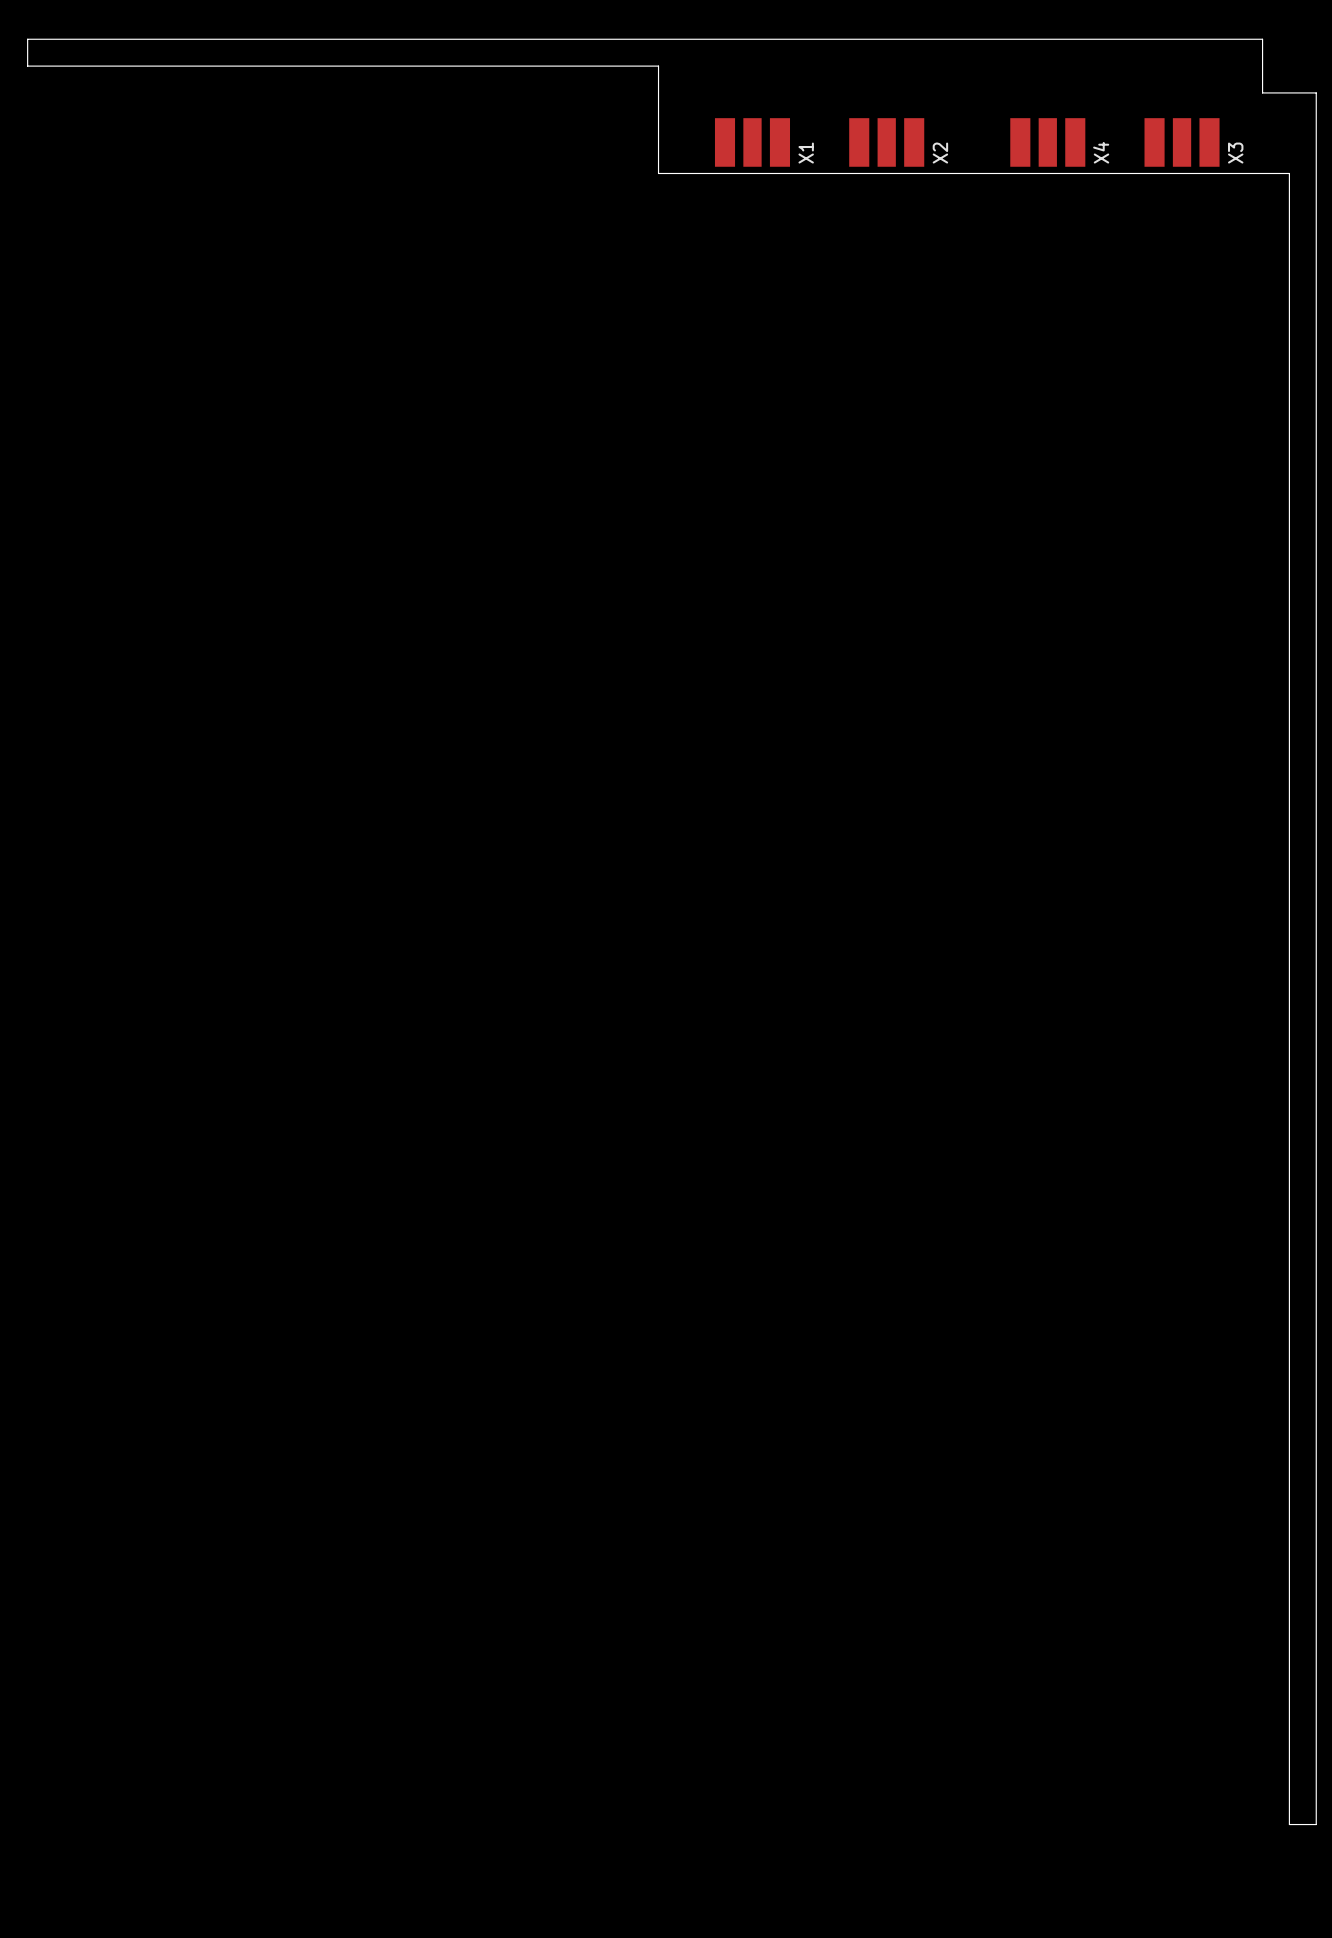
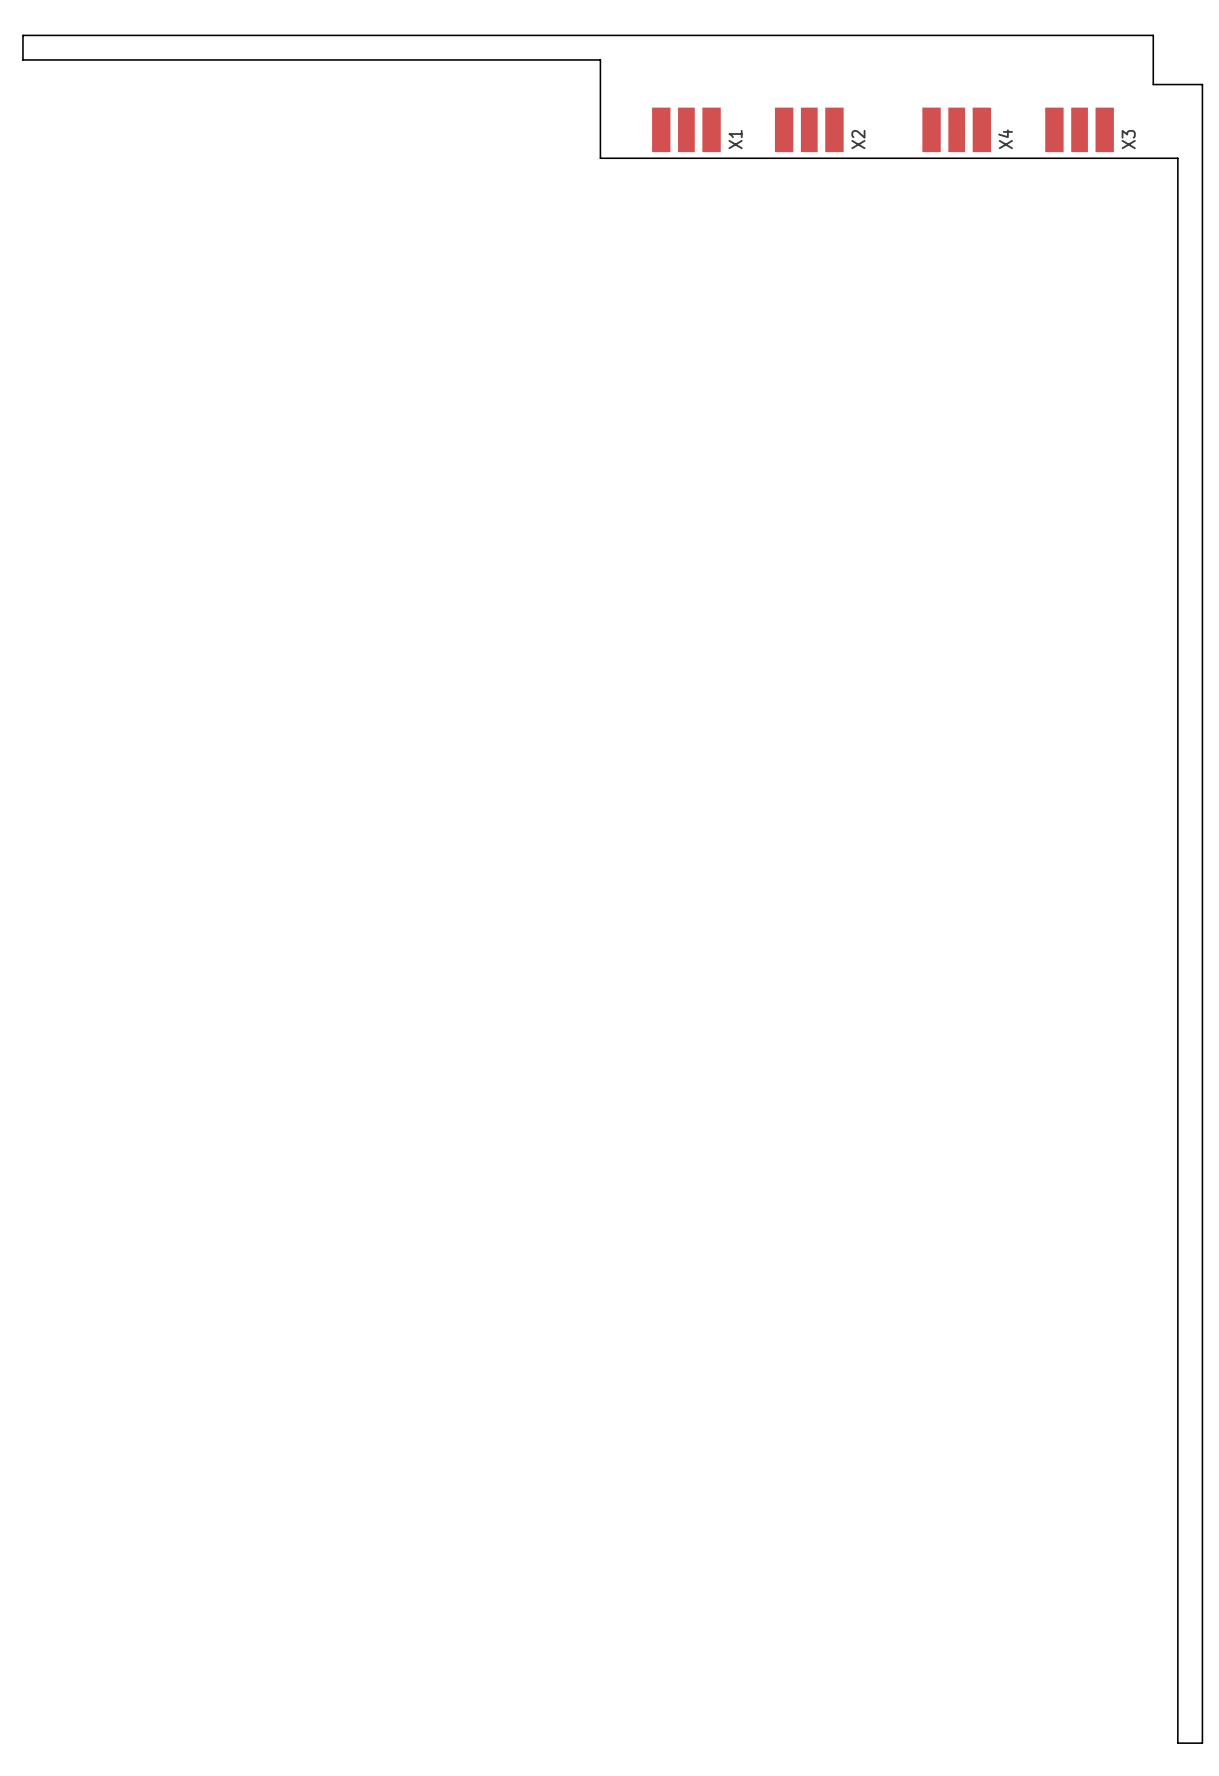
board edge: (1289, 1824) (1316, 1824) -> (1177, 1669) (1177, 1743) (1202, 1743) (1202, 1669)

